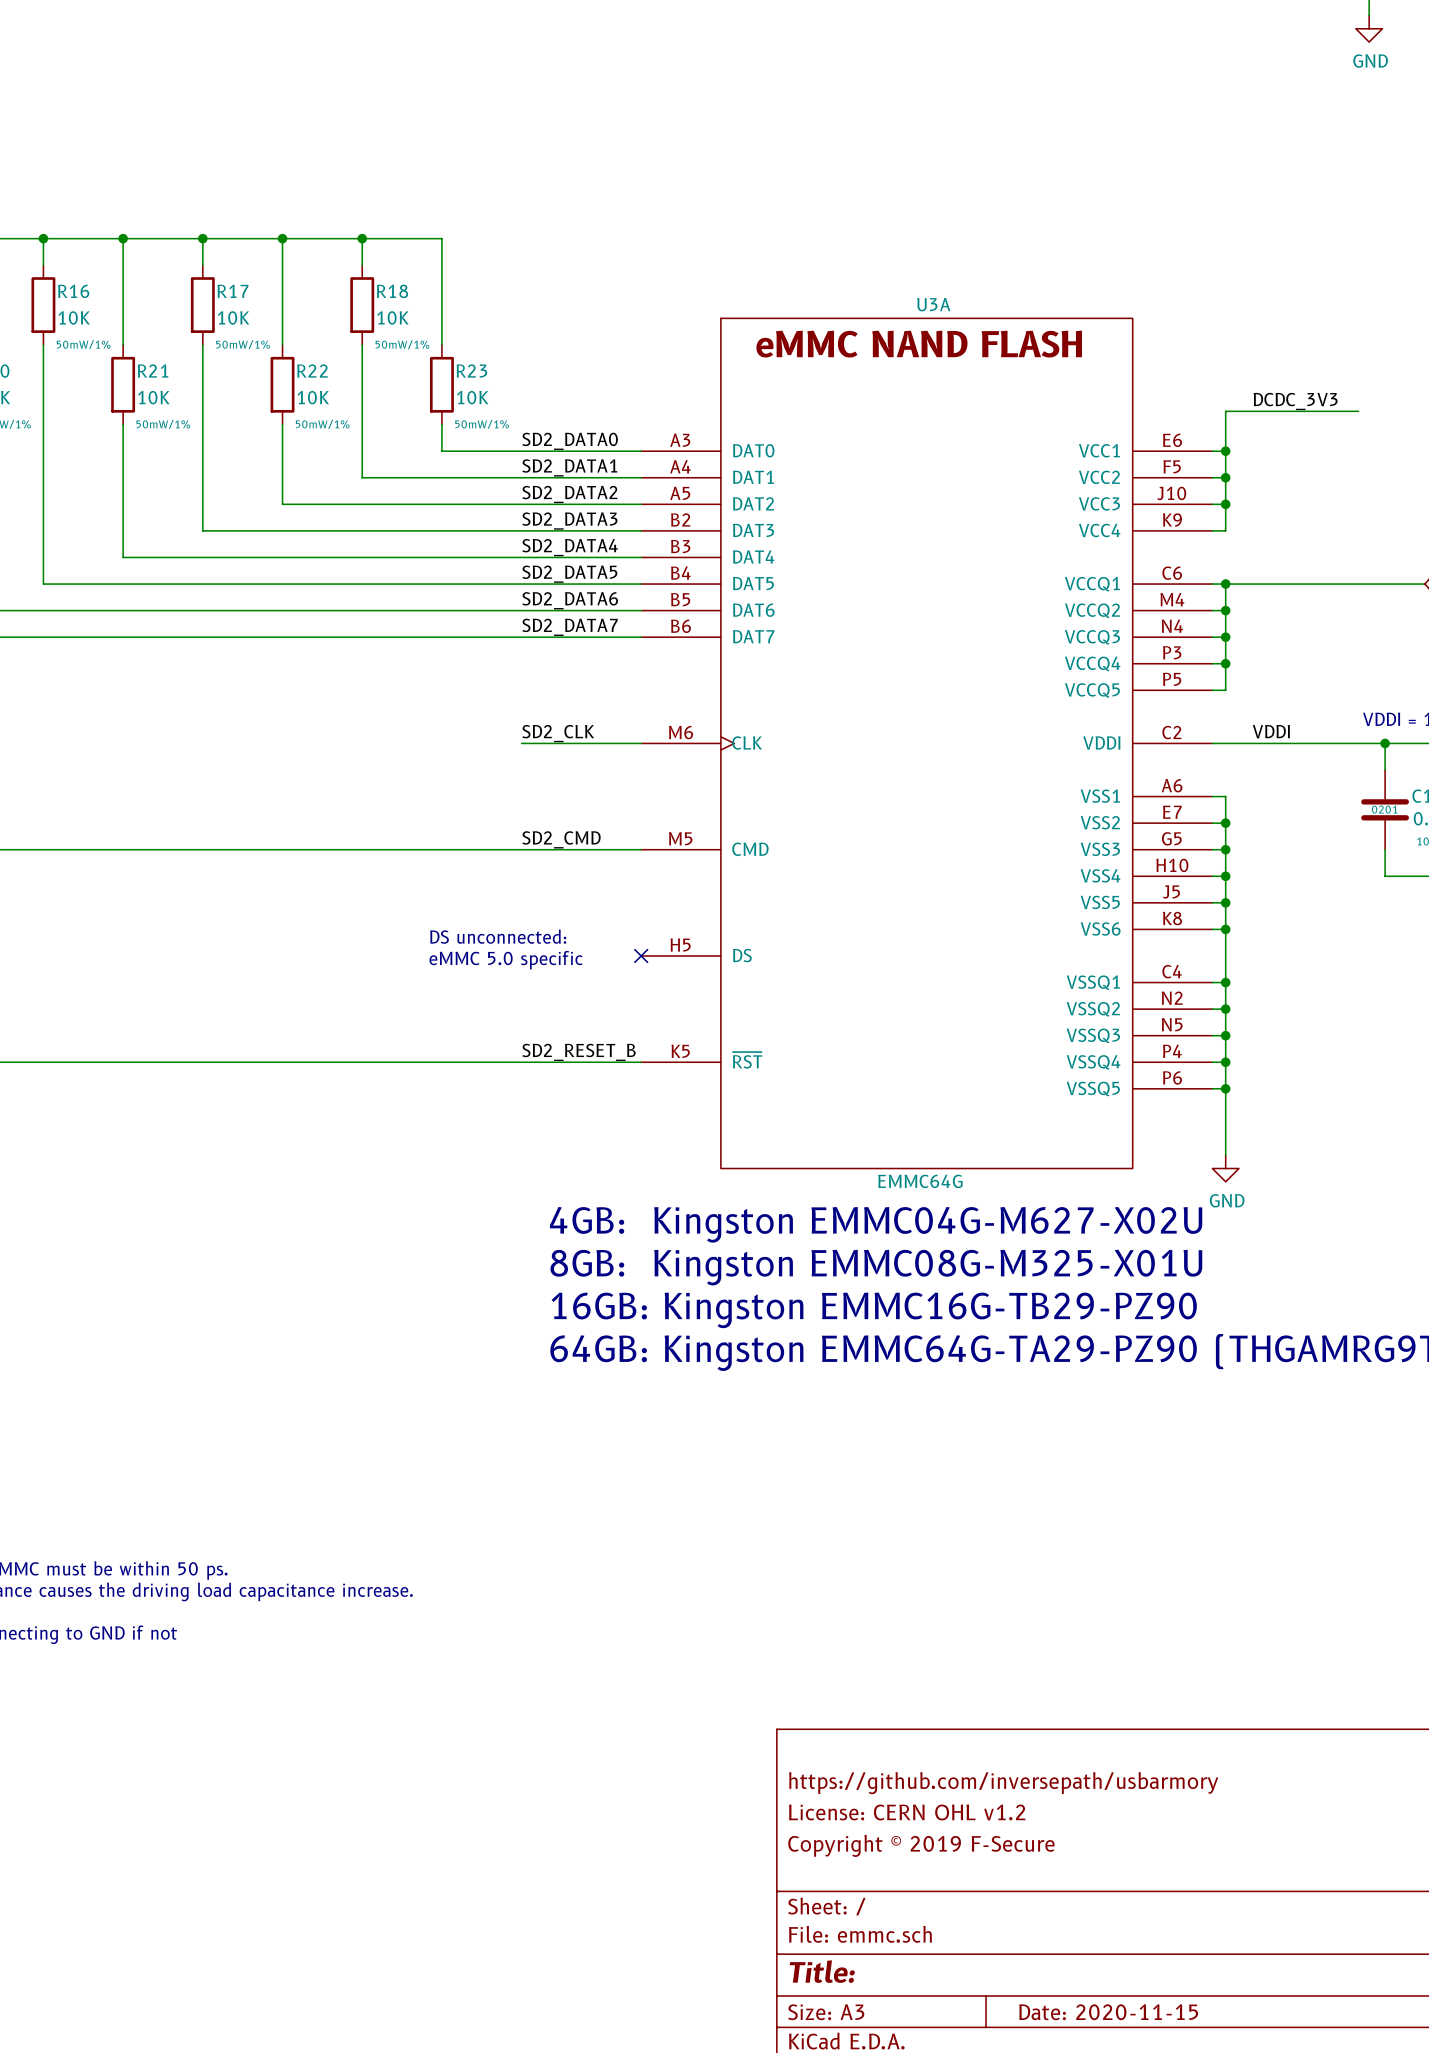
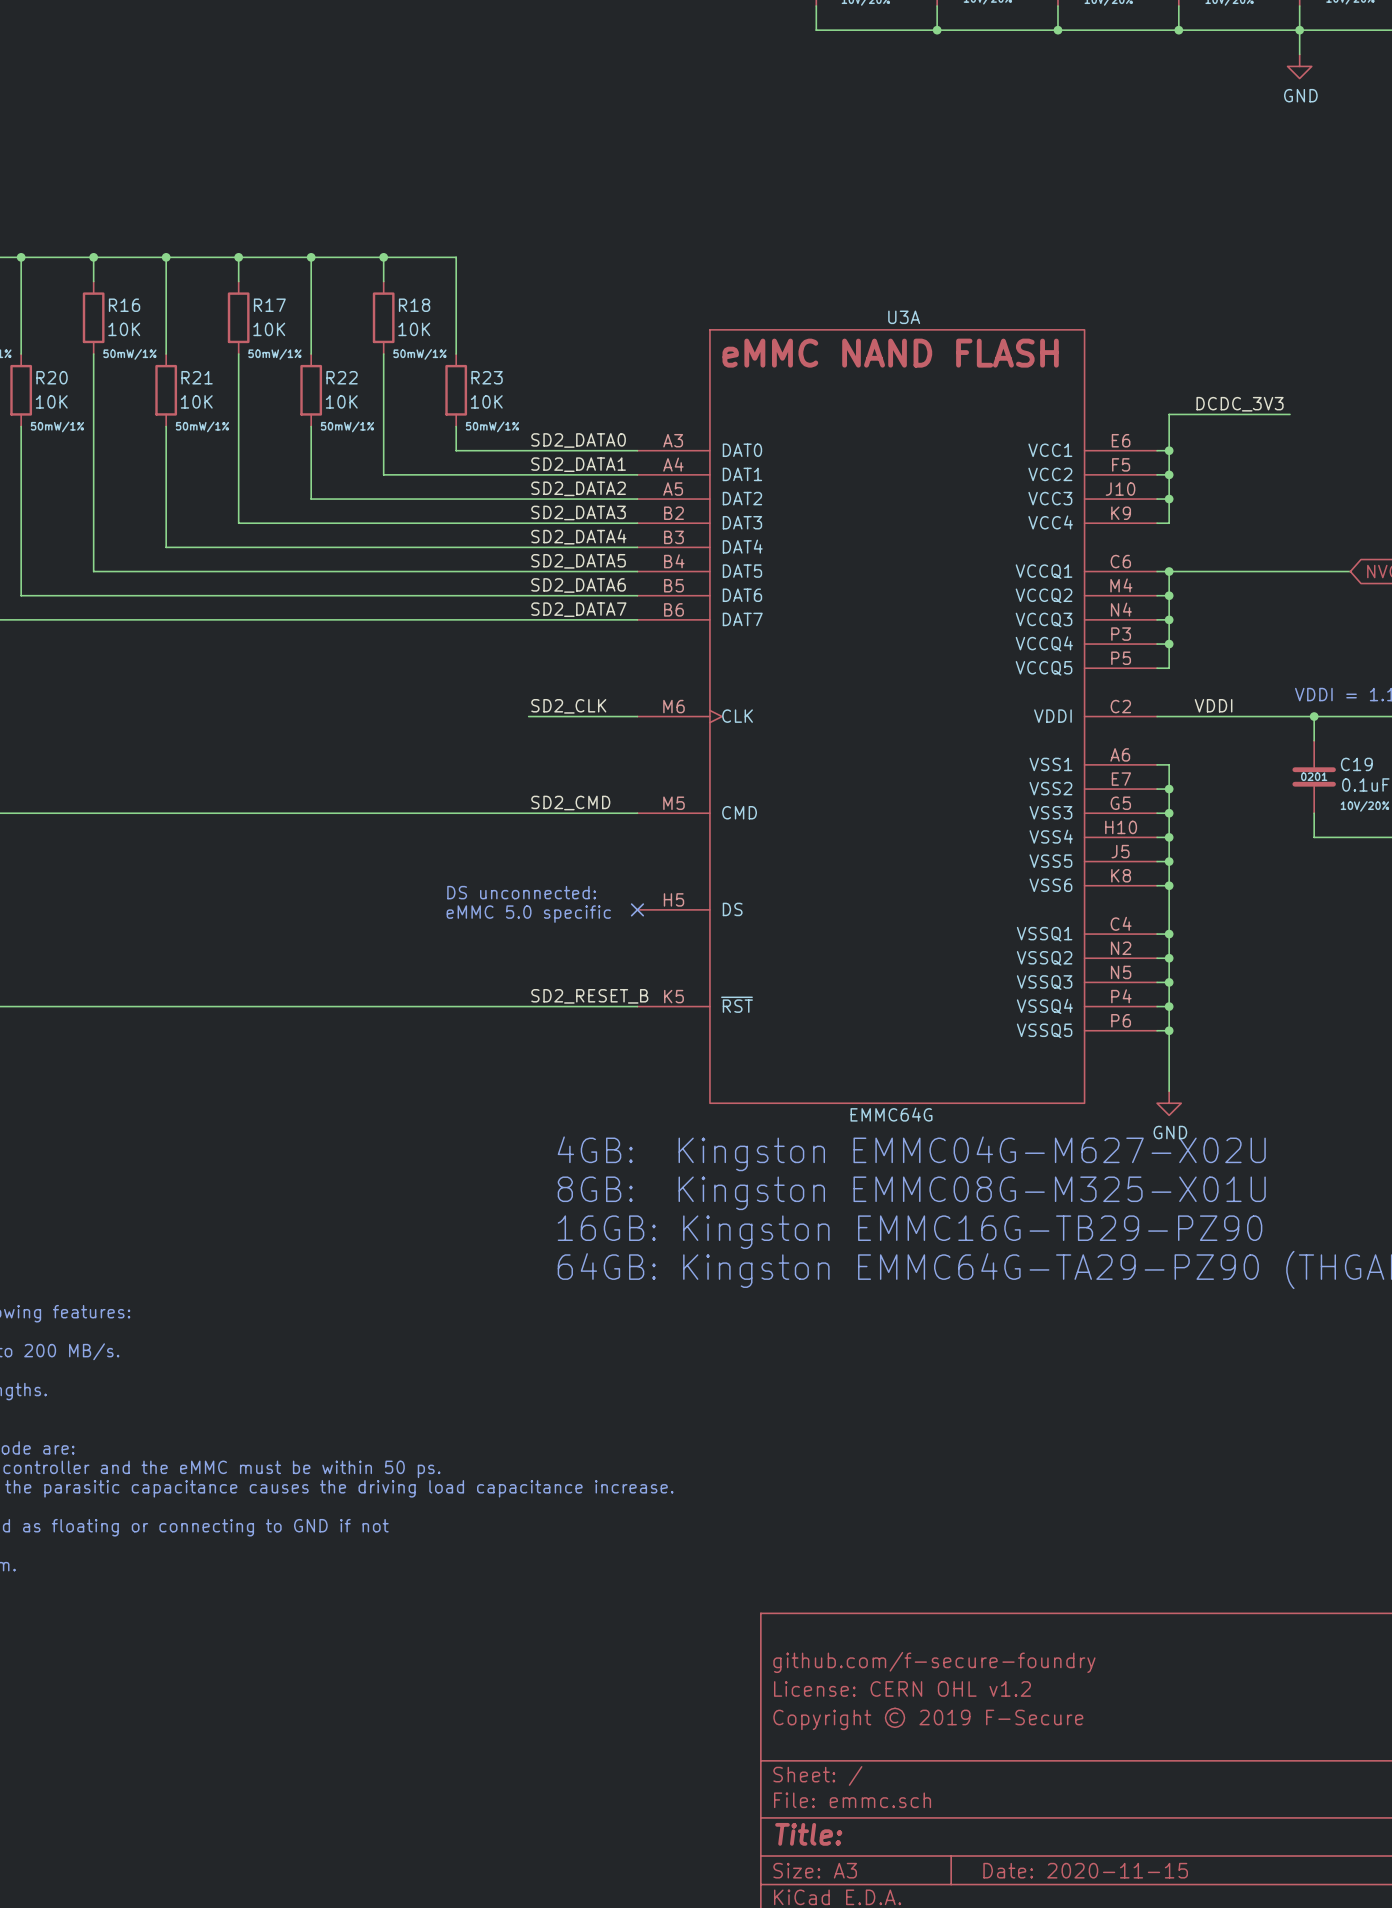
title block: https://github.com/inversepath/usbarmory (1003, 1783) -> github.com/f-secure-foundry (934, 1662)

